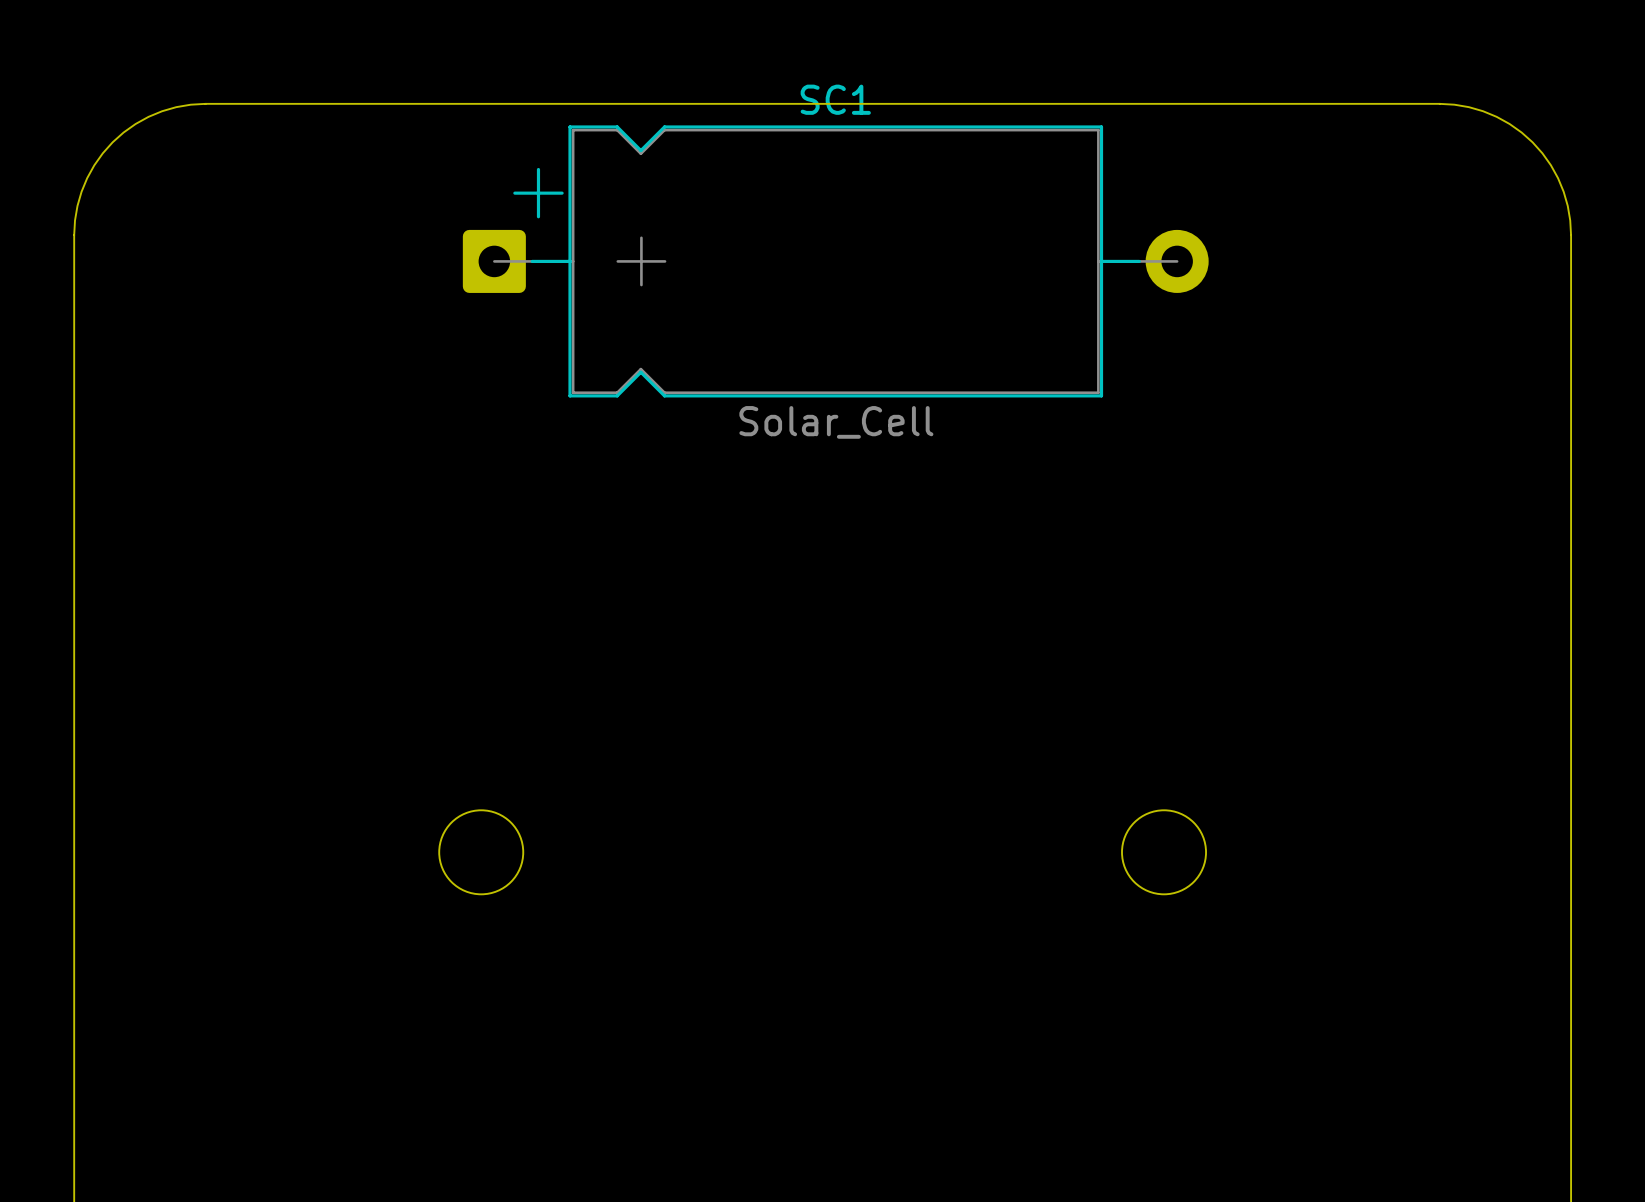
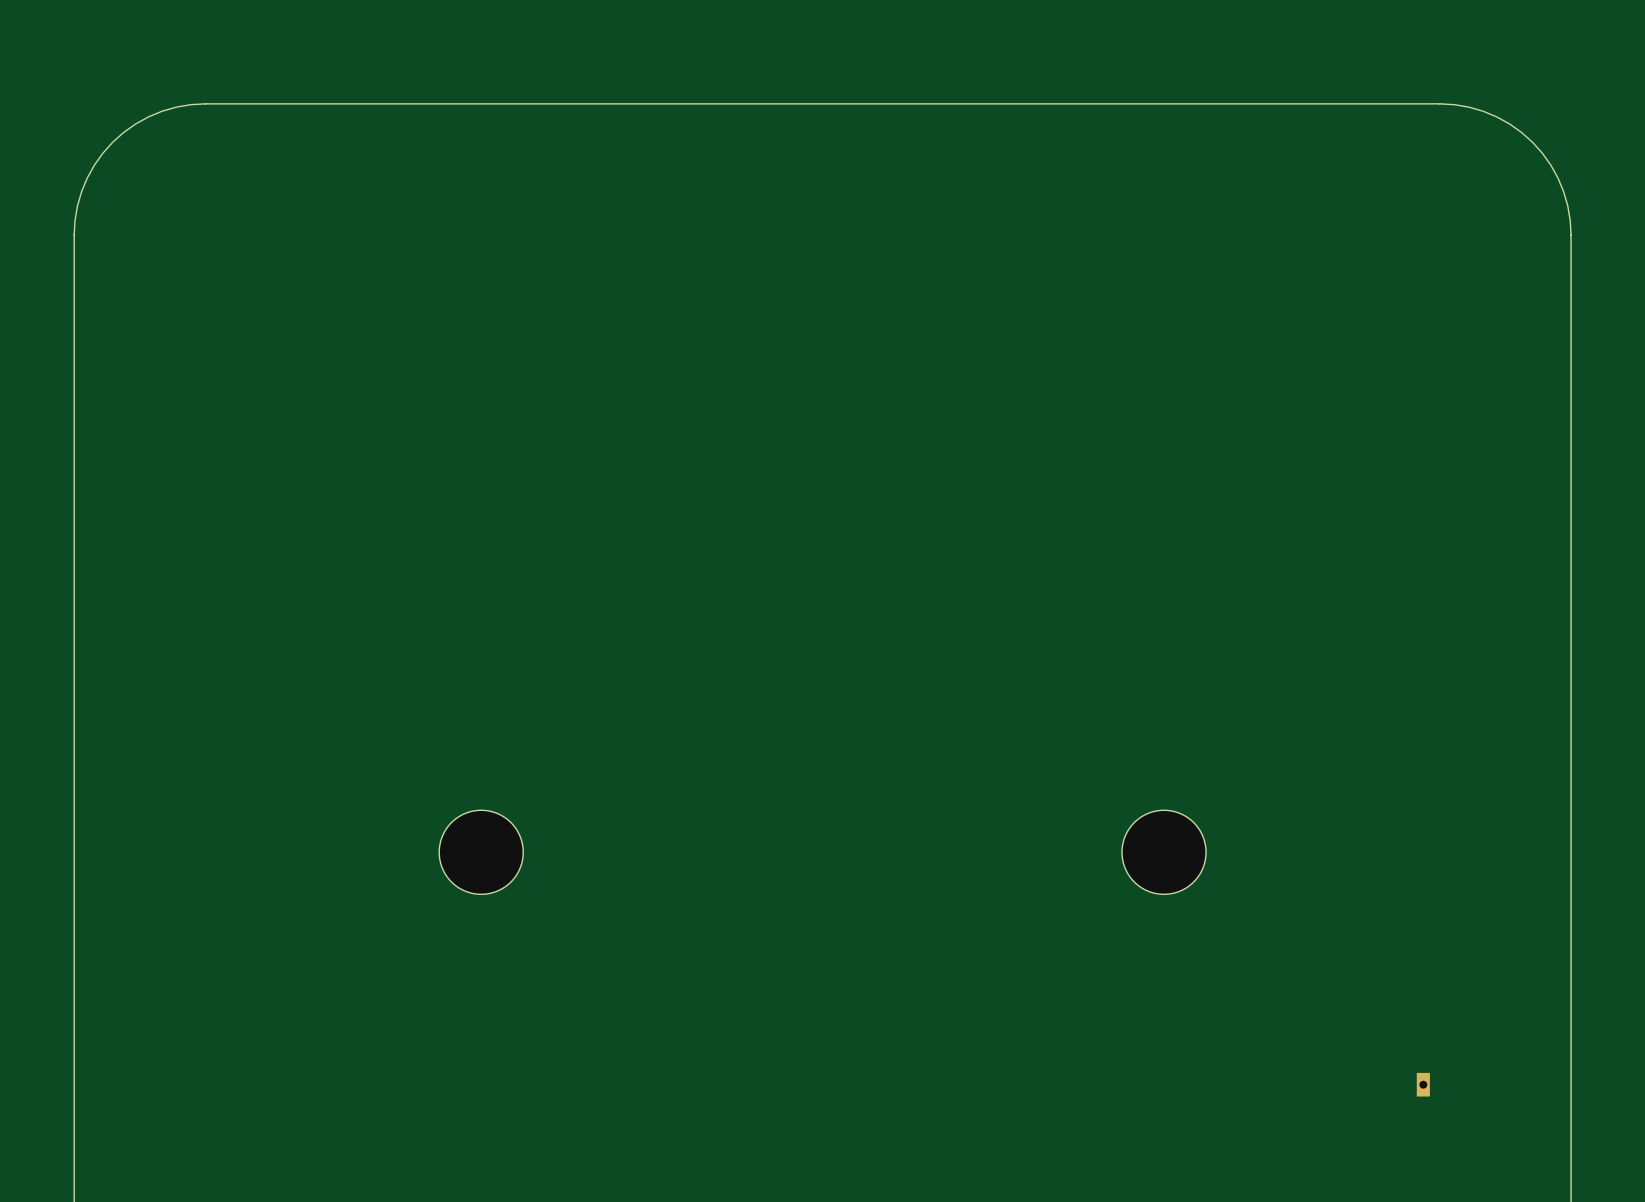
SC1: Solar_Cell (835, 261) -> none
part: none -> (1423, 1084)

